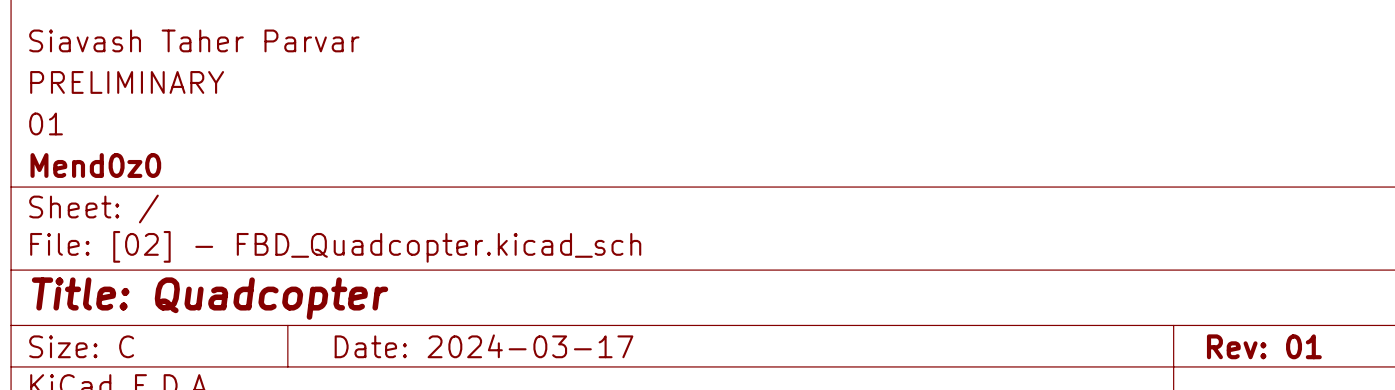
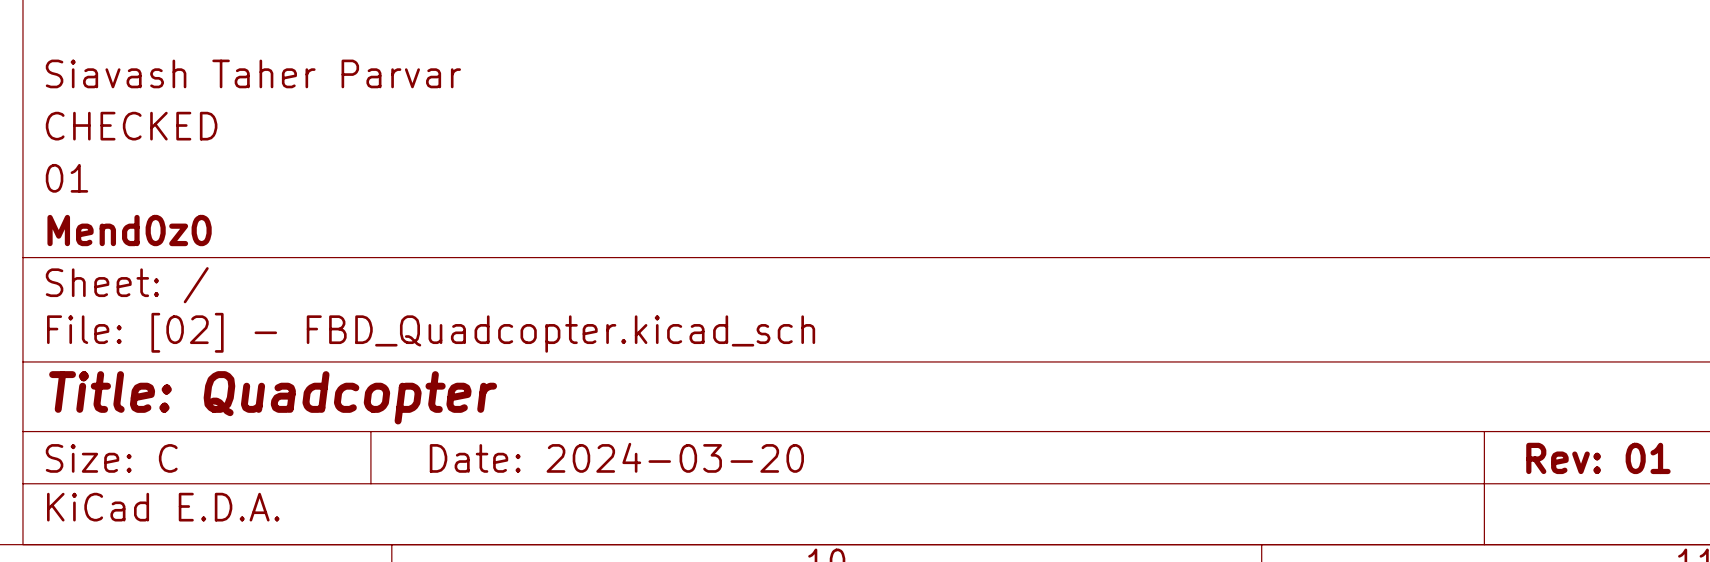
title block: PRELIMINARY (127, 82) -> CHECKED (131, 126)
title block: Date: 2024-03-17 (484, 346) -> Date: 2024-03-20 (616, 457)

